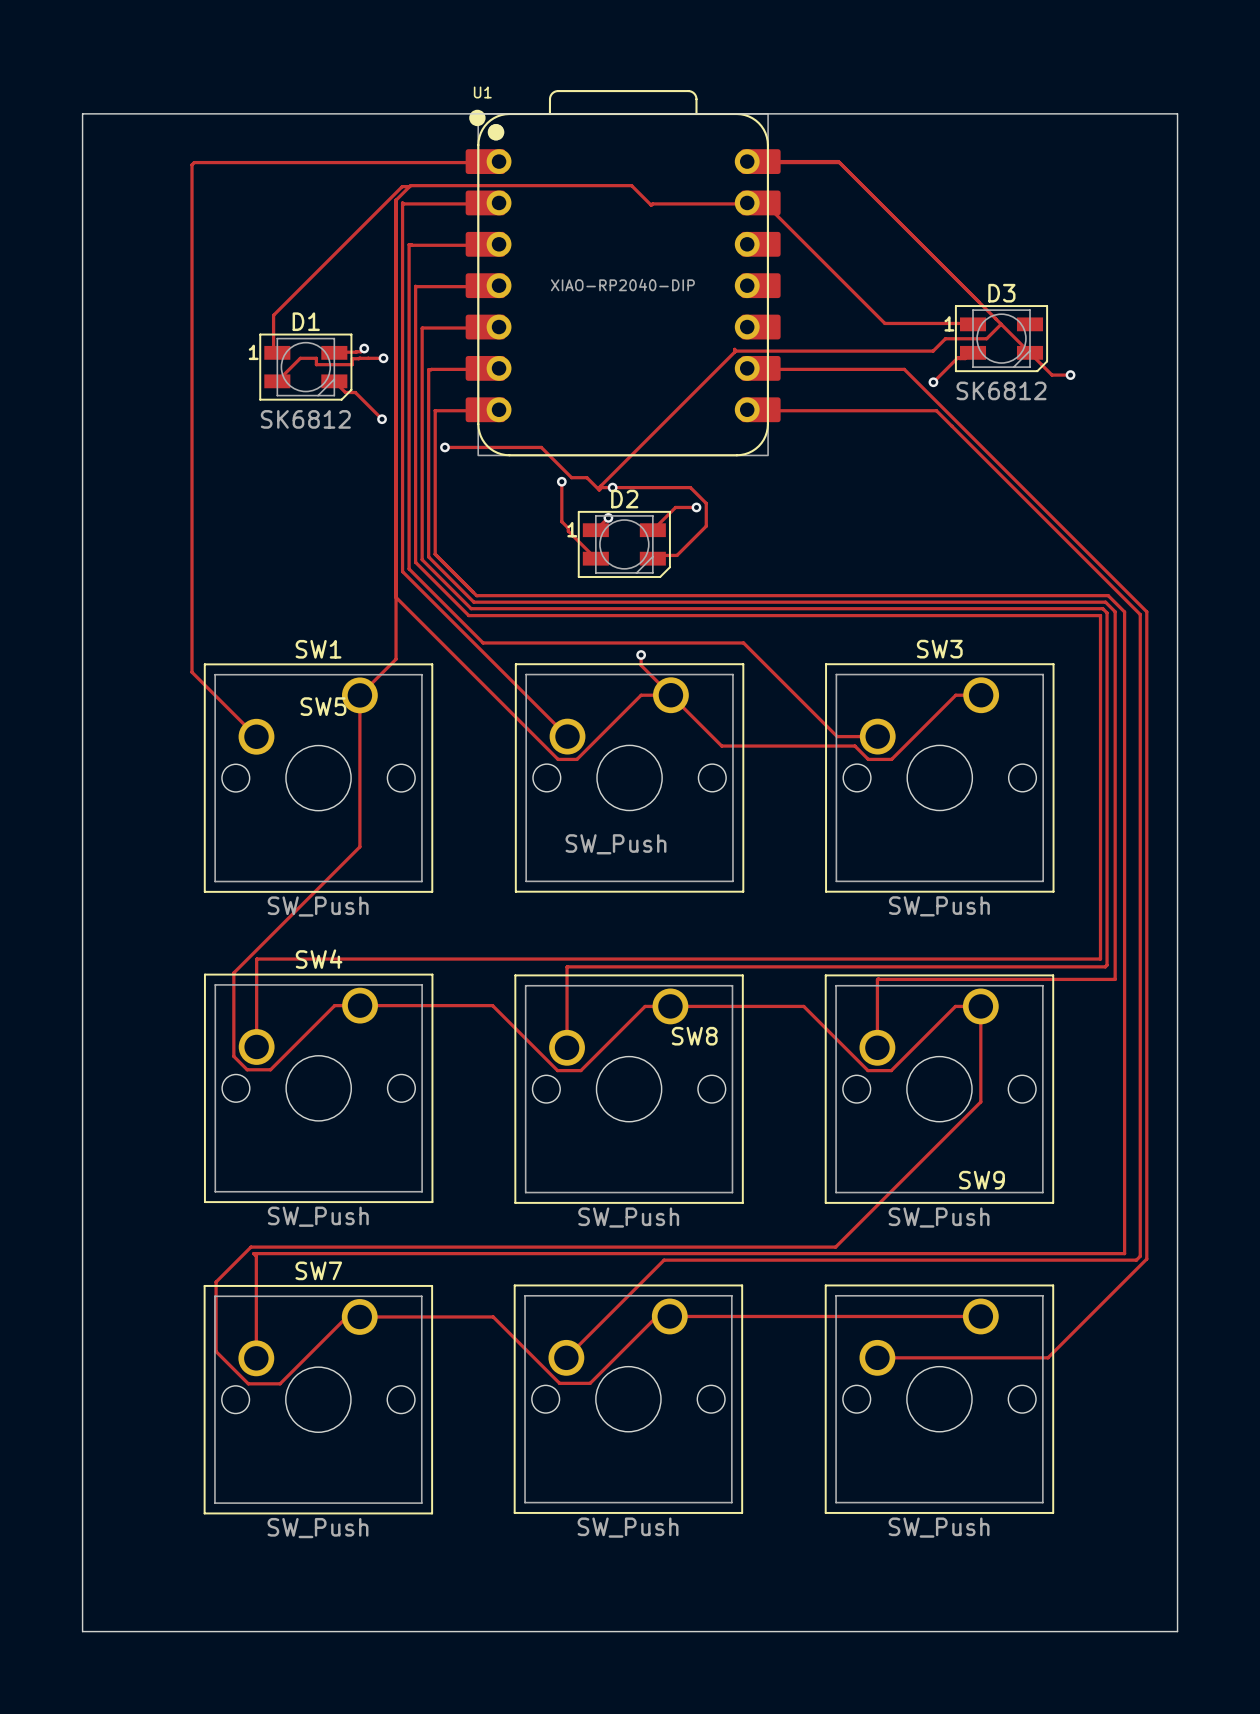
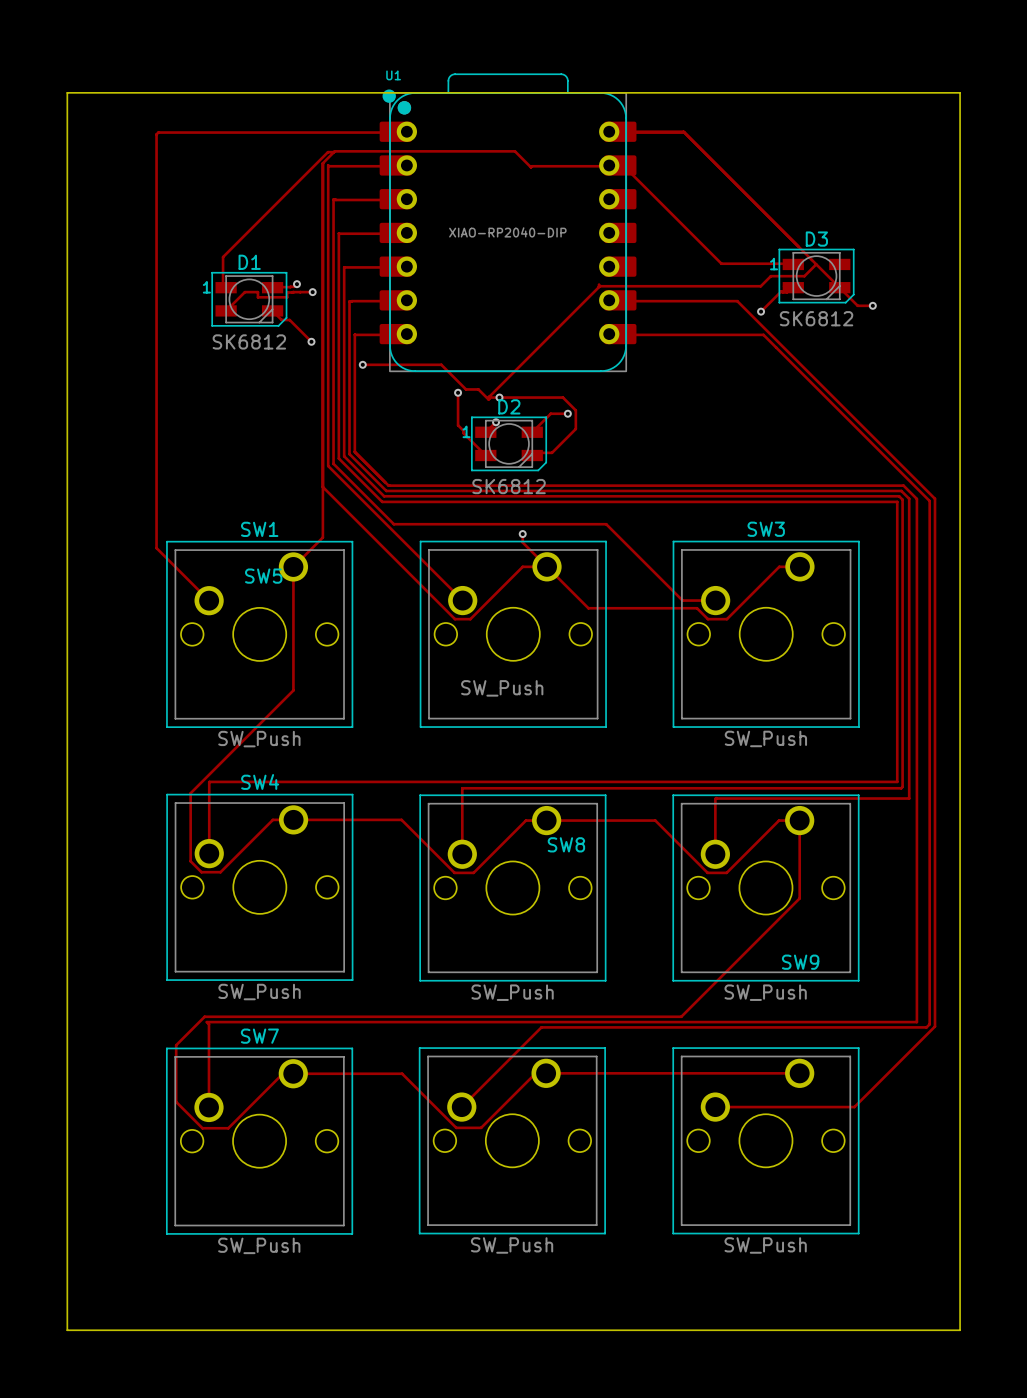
D2 value: none -> SK6812 (509, 486)

